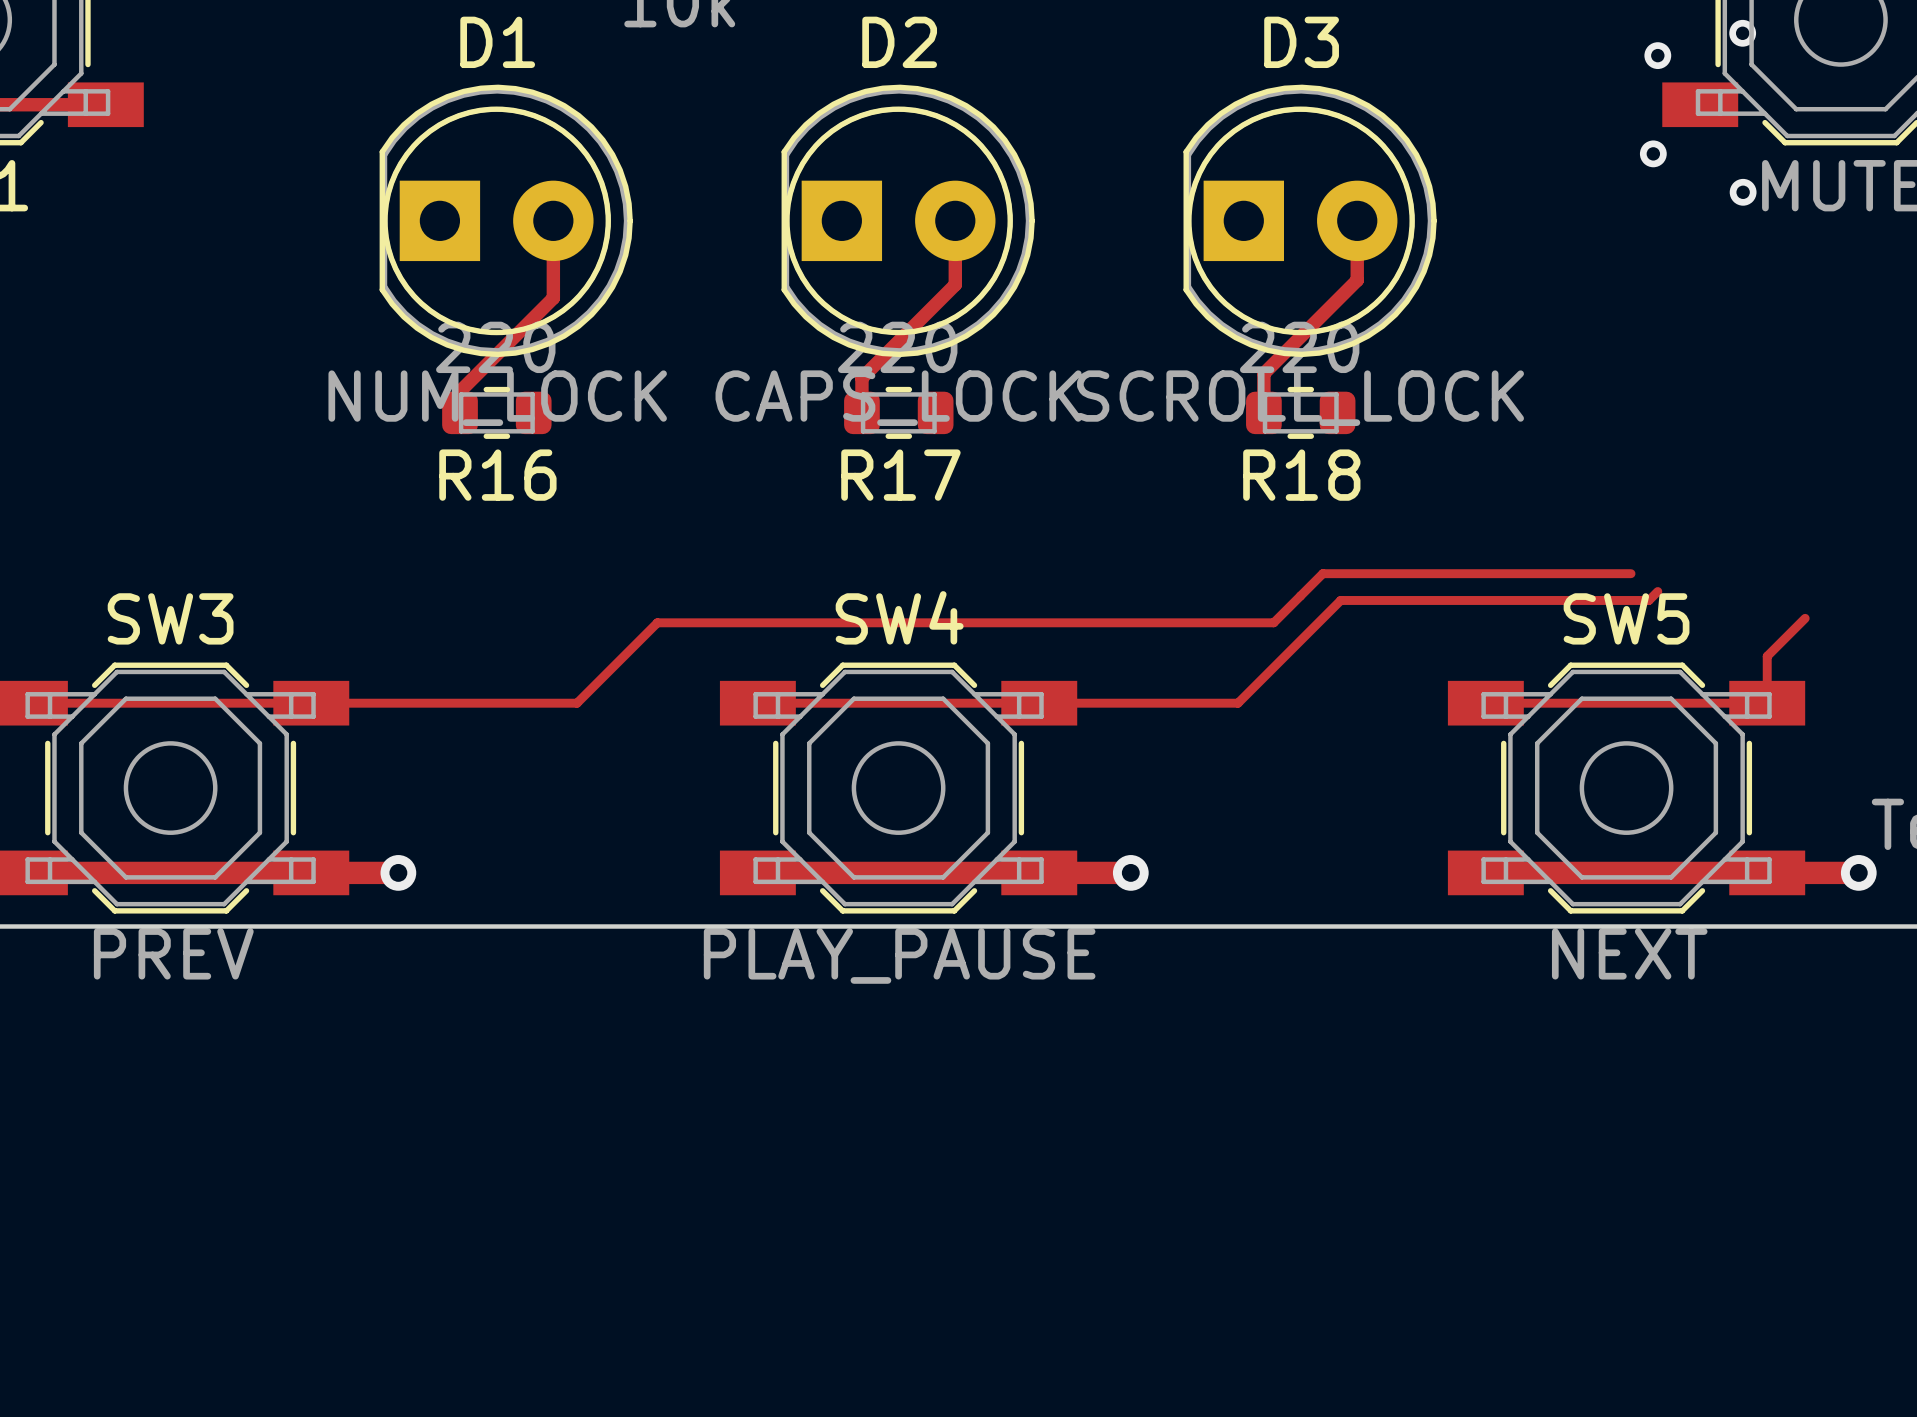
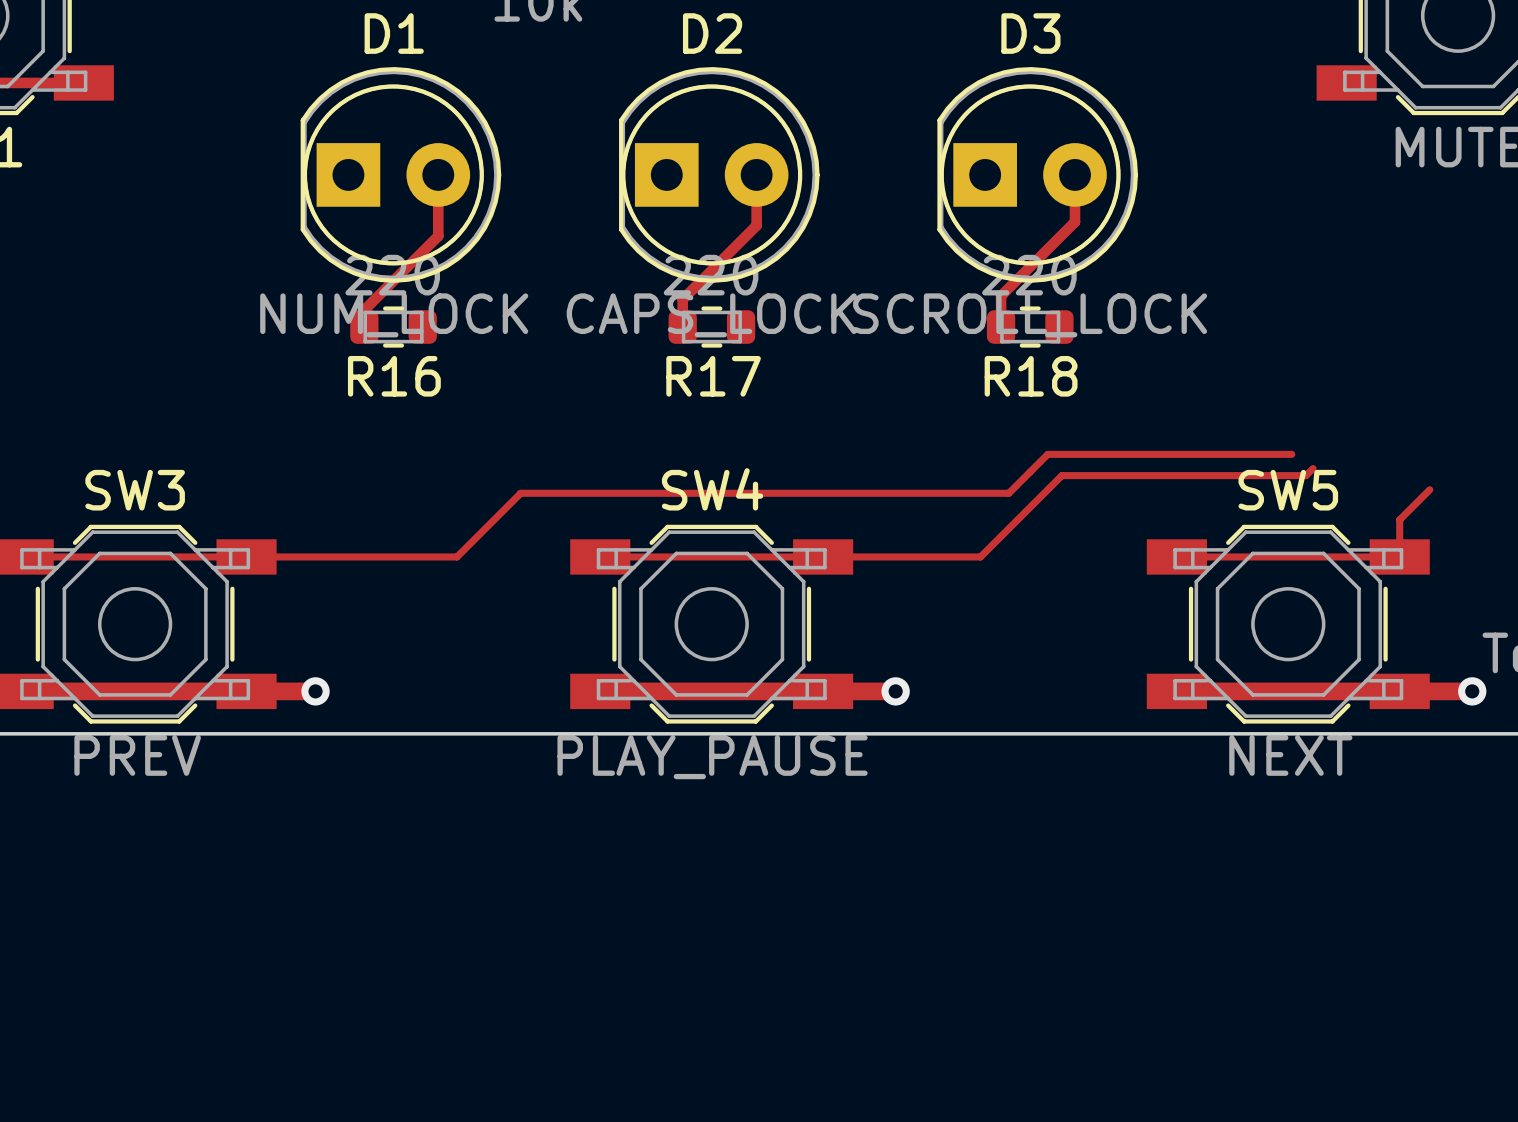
via: (1742, 33) -> none
via: (1657, 55) -> none
via: (1653, 153) -> none
via: (1743, 192) -> none

